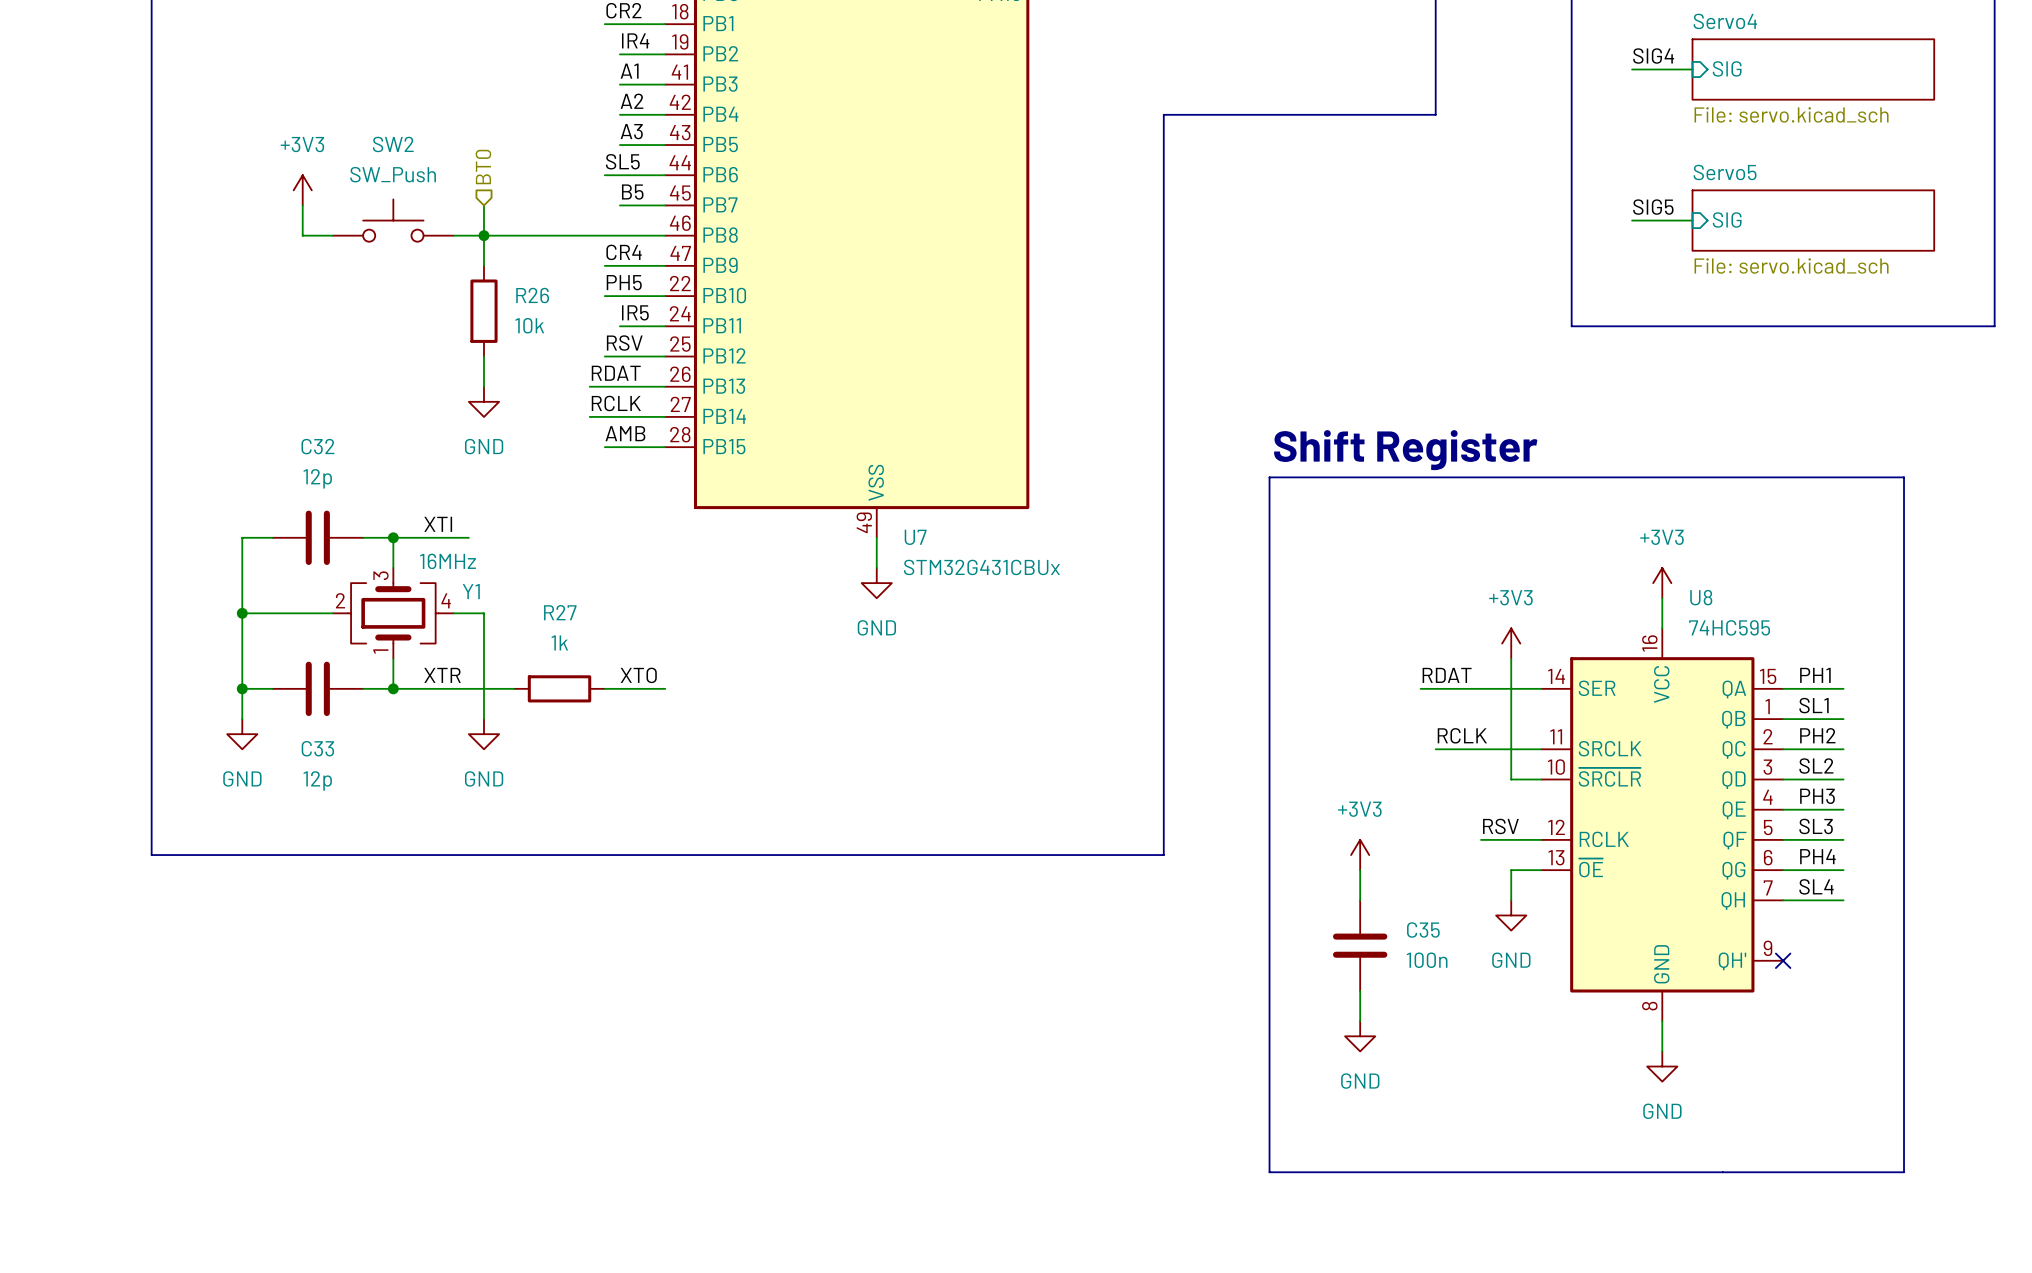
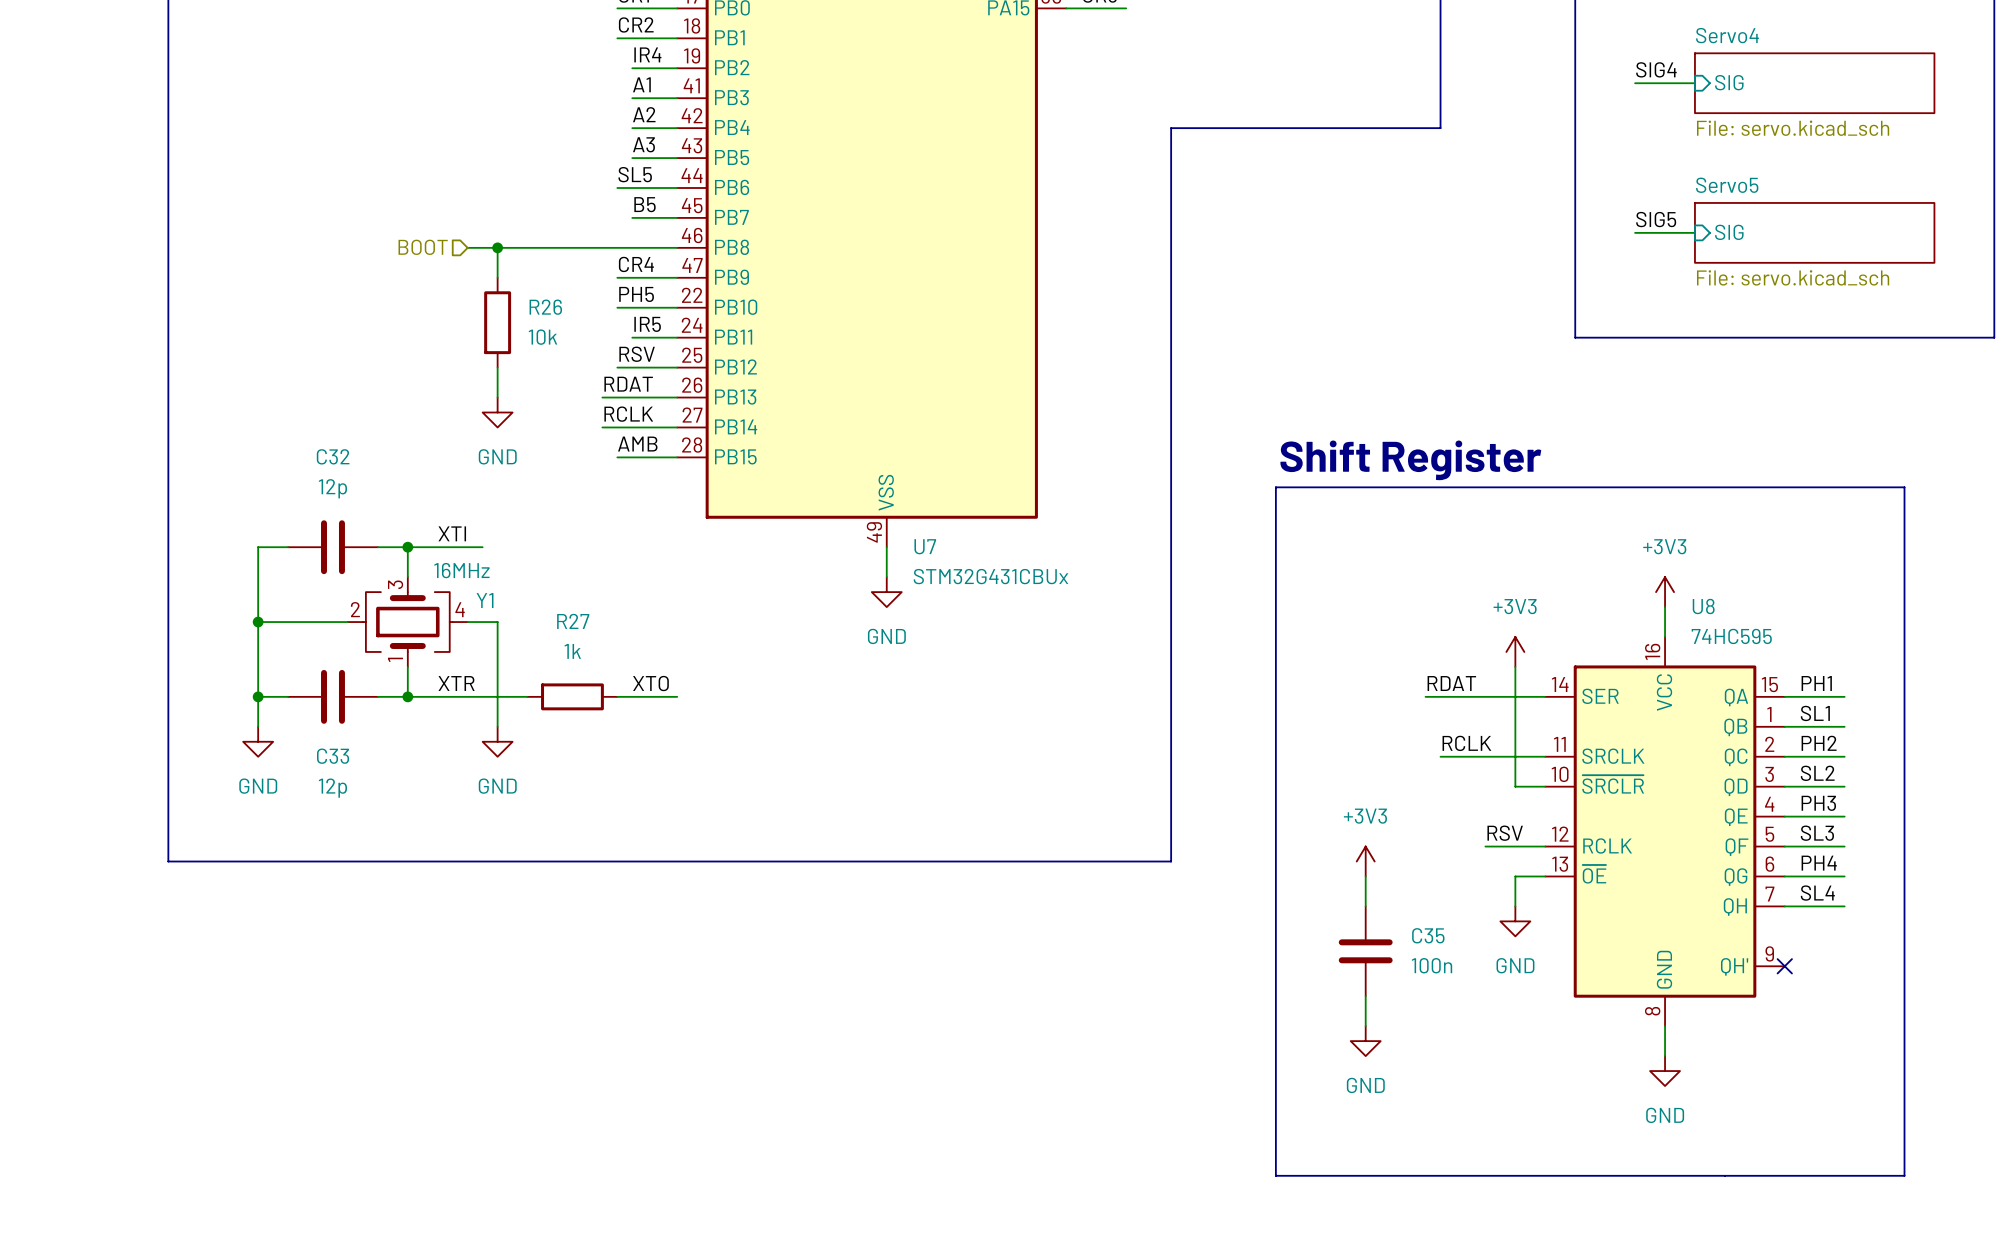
hierarchical label: BT0 (483, 167) -> none
power symbol: +3V3 (302, 190) -> none
wire: (302, 205) (302, 235) (332, 235) -> none
wire: (483, 205) (483, 235) -> none
SW2: SW_Push (393, 220) -> none
hierarchical label: none -> BOOT (423, 247)

